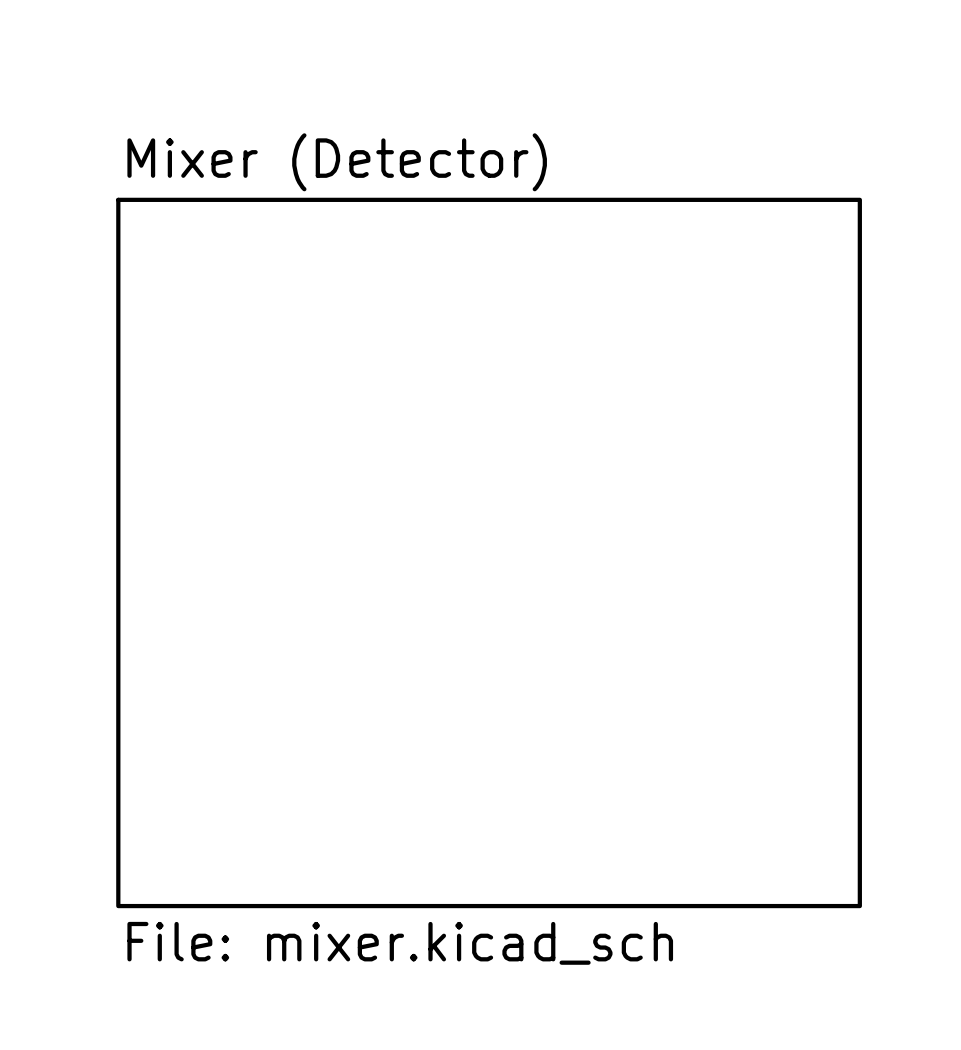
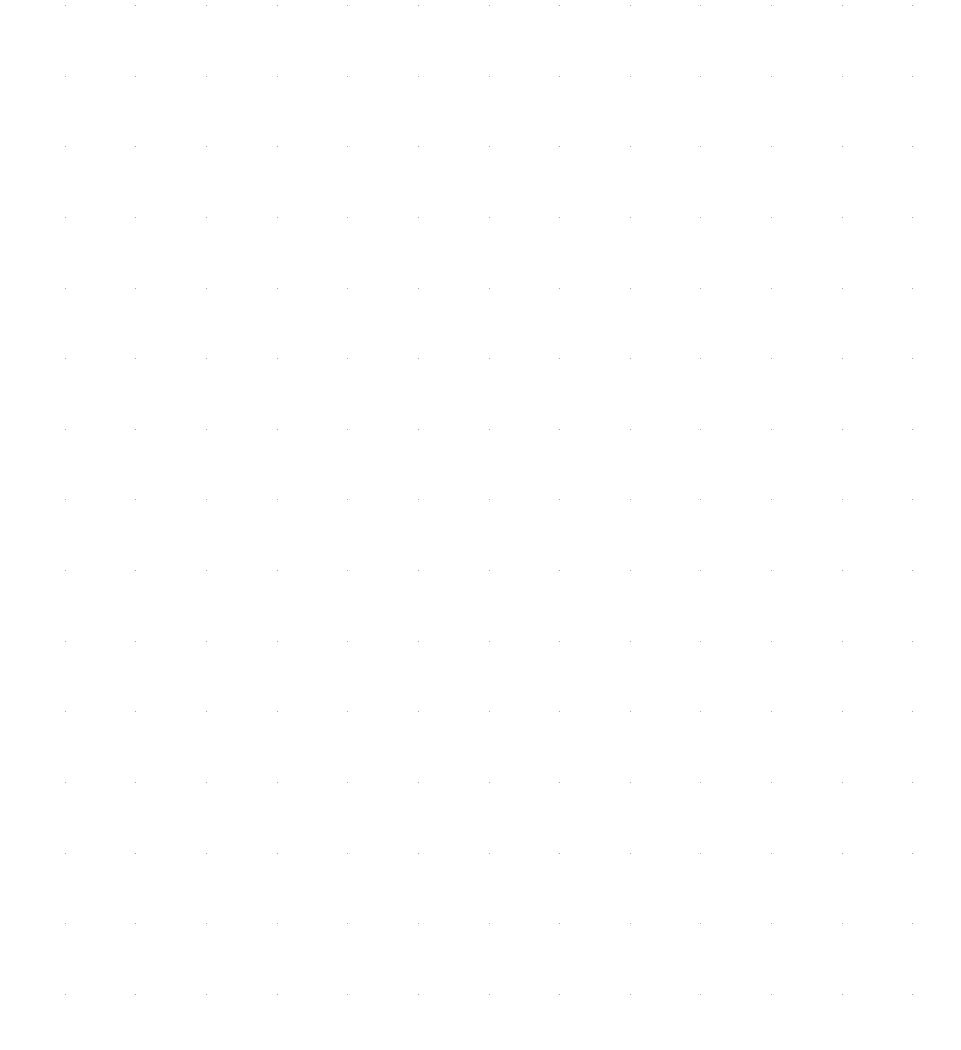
sheet Mixer (Detector): File: mixer.kicad_sch (489, 552) -> none

